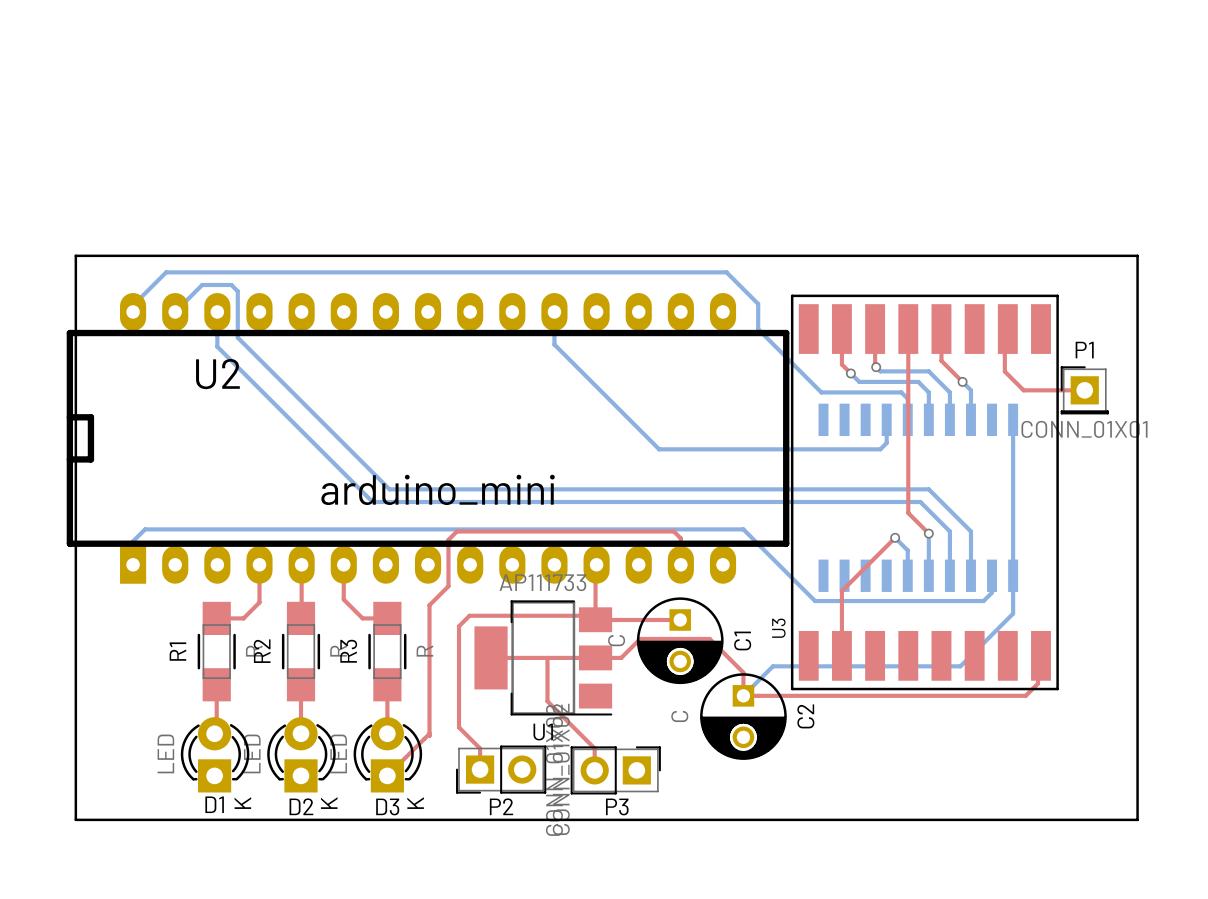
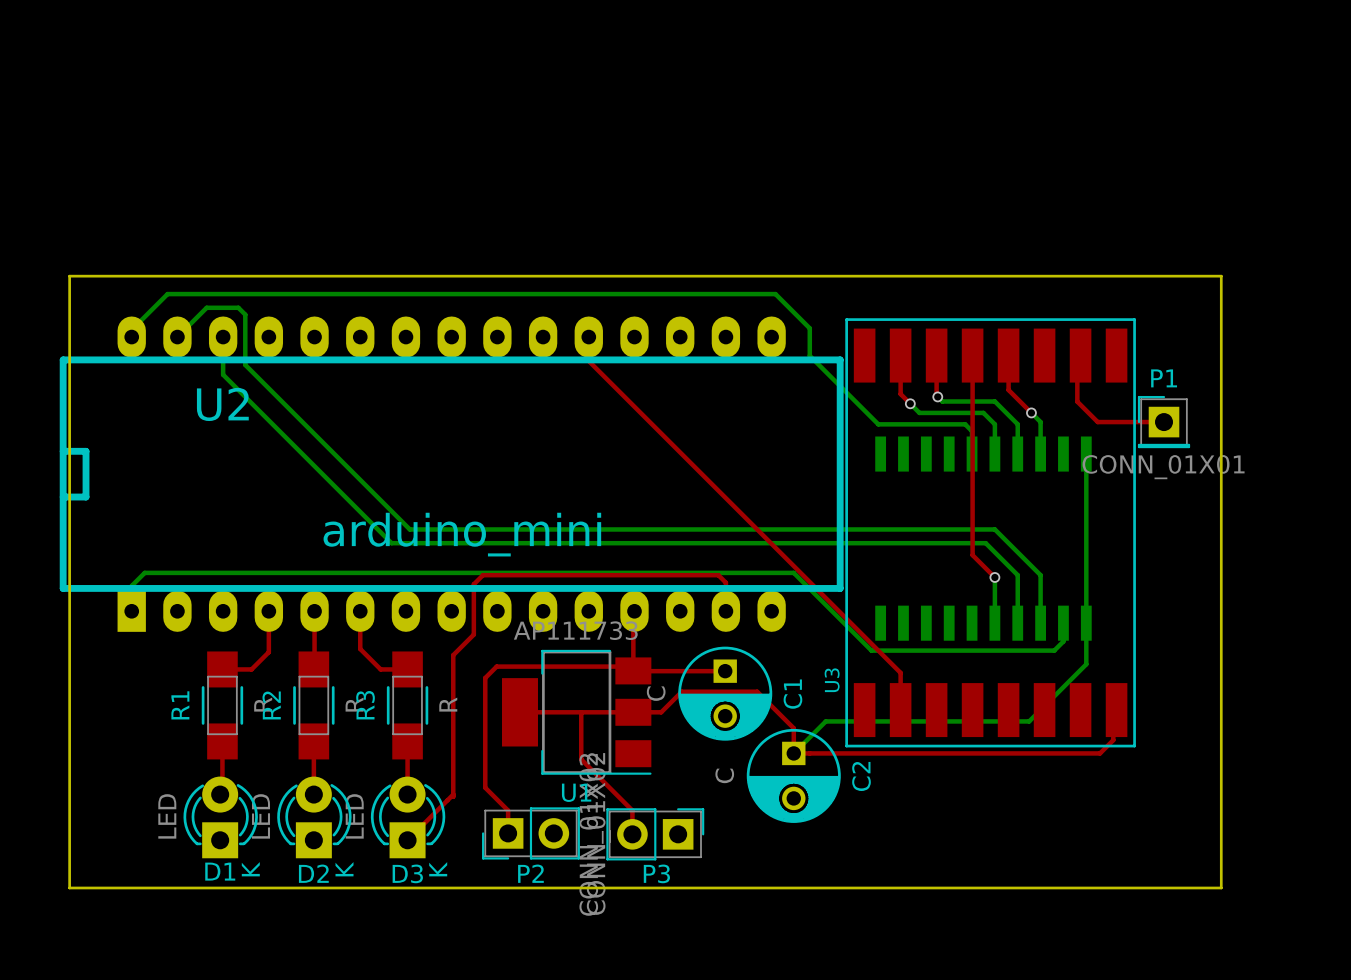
bottom track: (554, 311) (554, 344) (659, 449) (880, 449) (886, 443) (886, 419) -> none
top track: (895, 537) (841, 591) (841, 621) -> (588, 337) (588, 361) (900, 672)
bottom track: (895, 537) (907, 550) (907, 575) -> none
via: (895, 537) -> none

